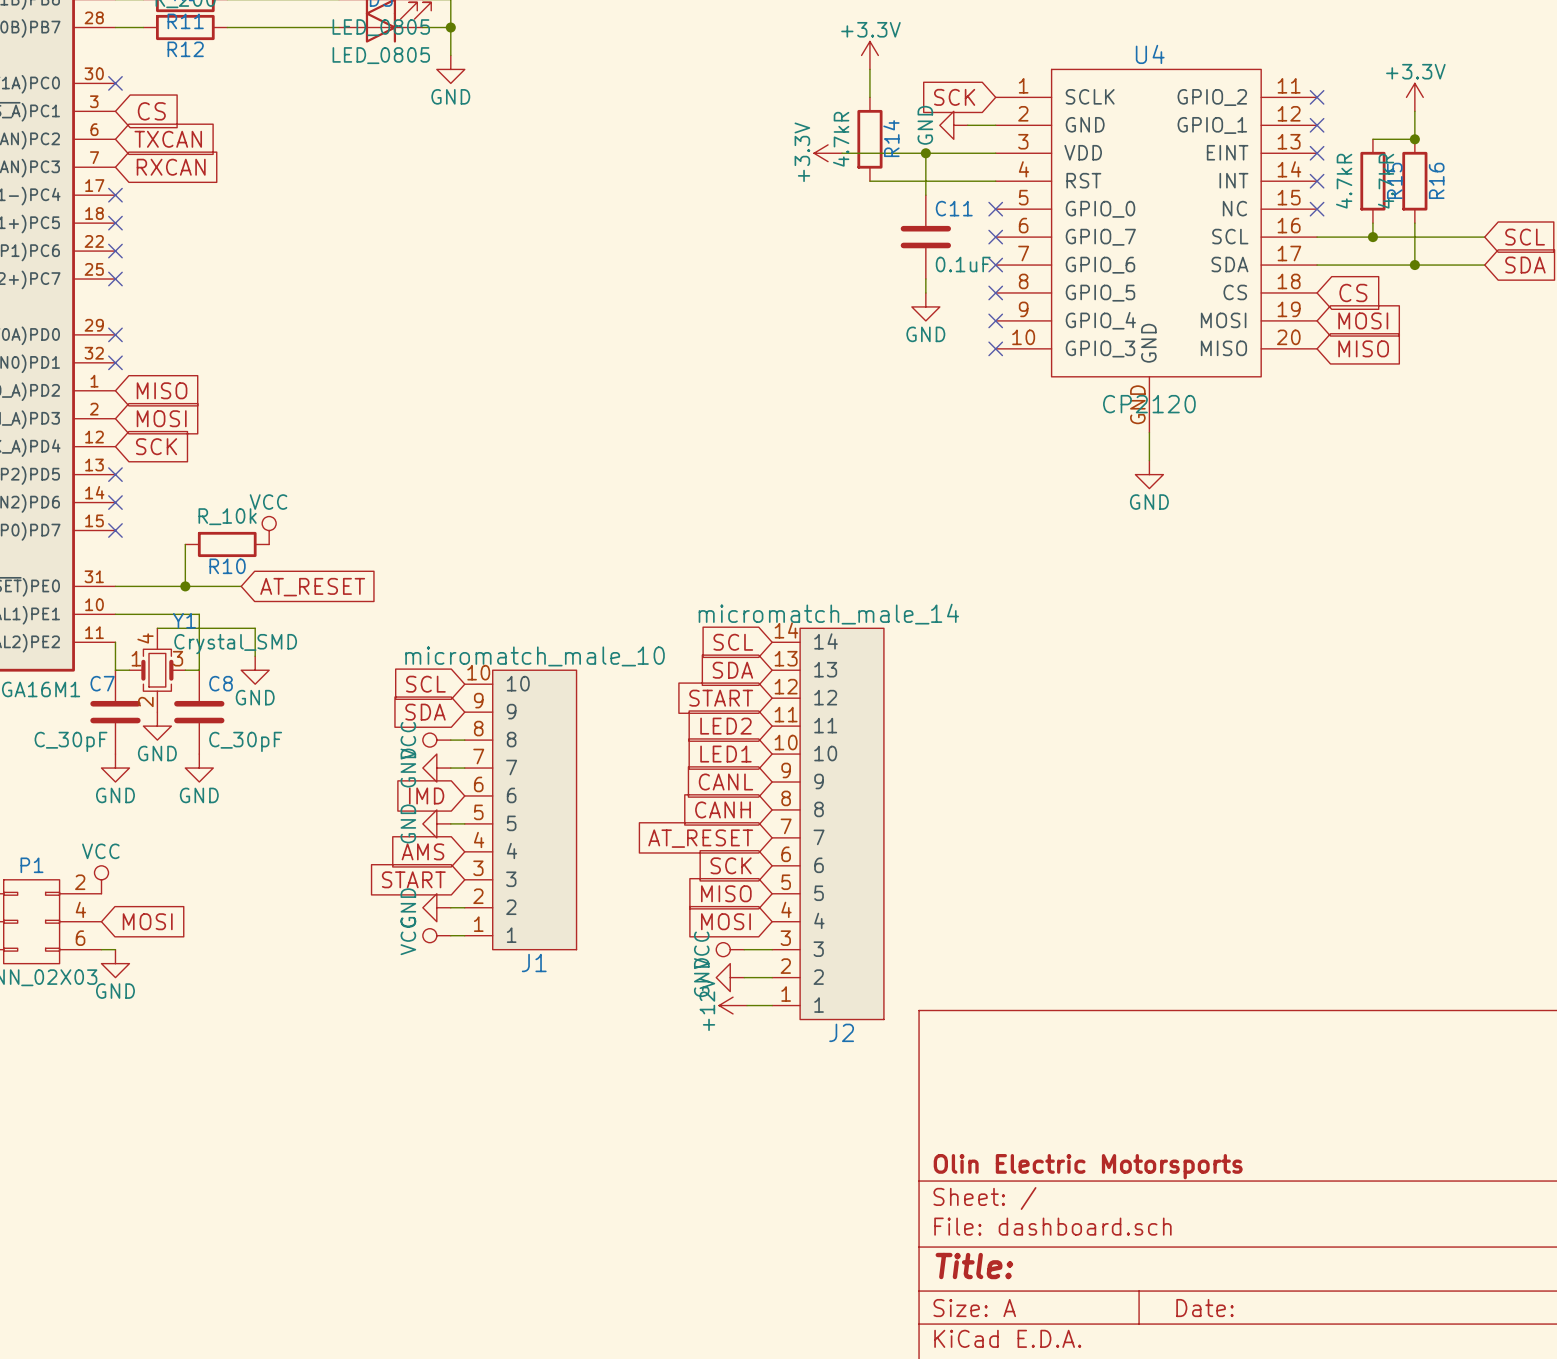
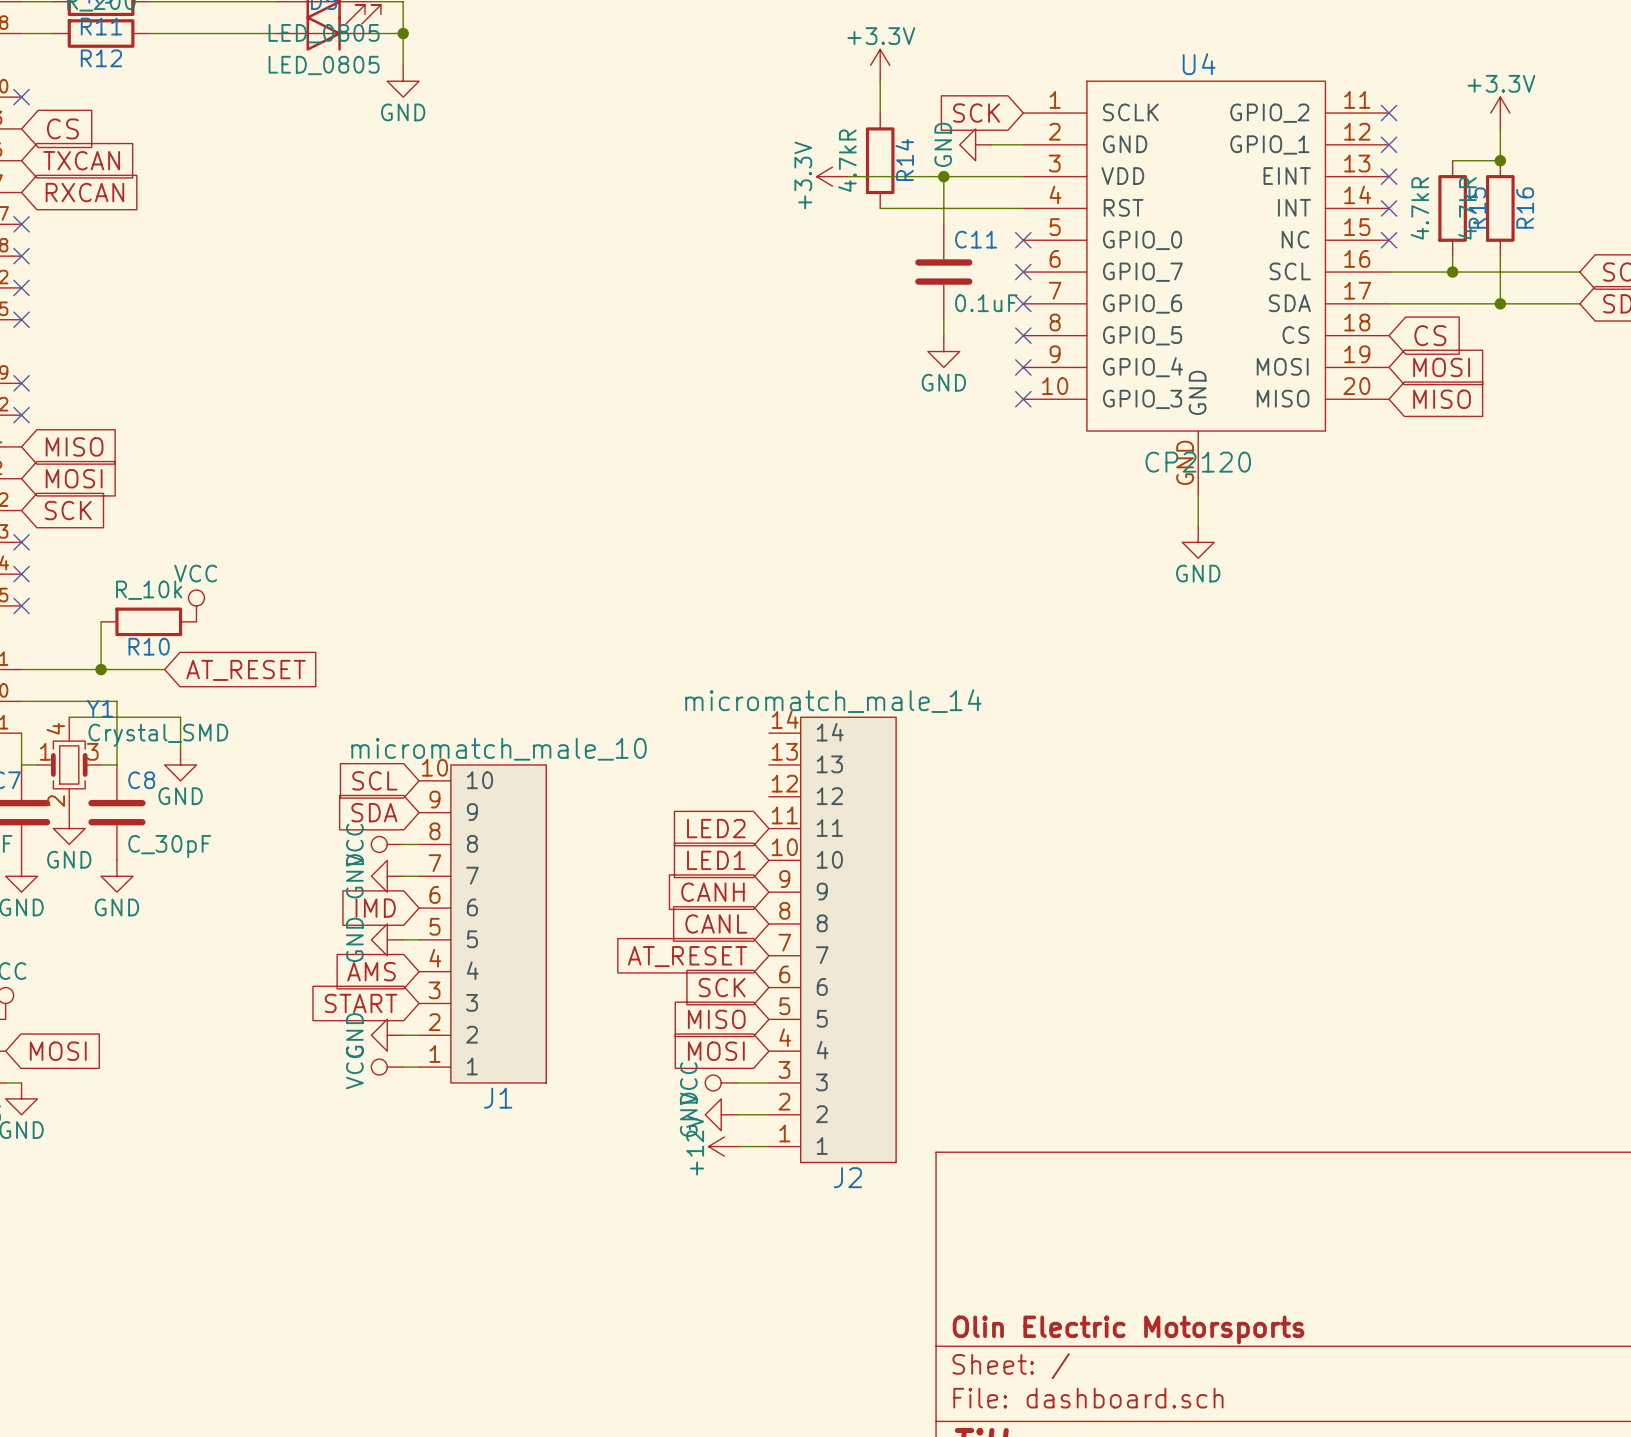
global label: SCL (733, 642) -> none
global label: SDA (732, 670) -> none
global label: START (721, 698) -> none
global label: CANL (725, 782) -> CANH (712, 892)
global label: CANH (723, 809) -> CANL (716, 923)

